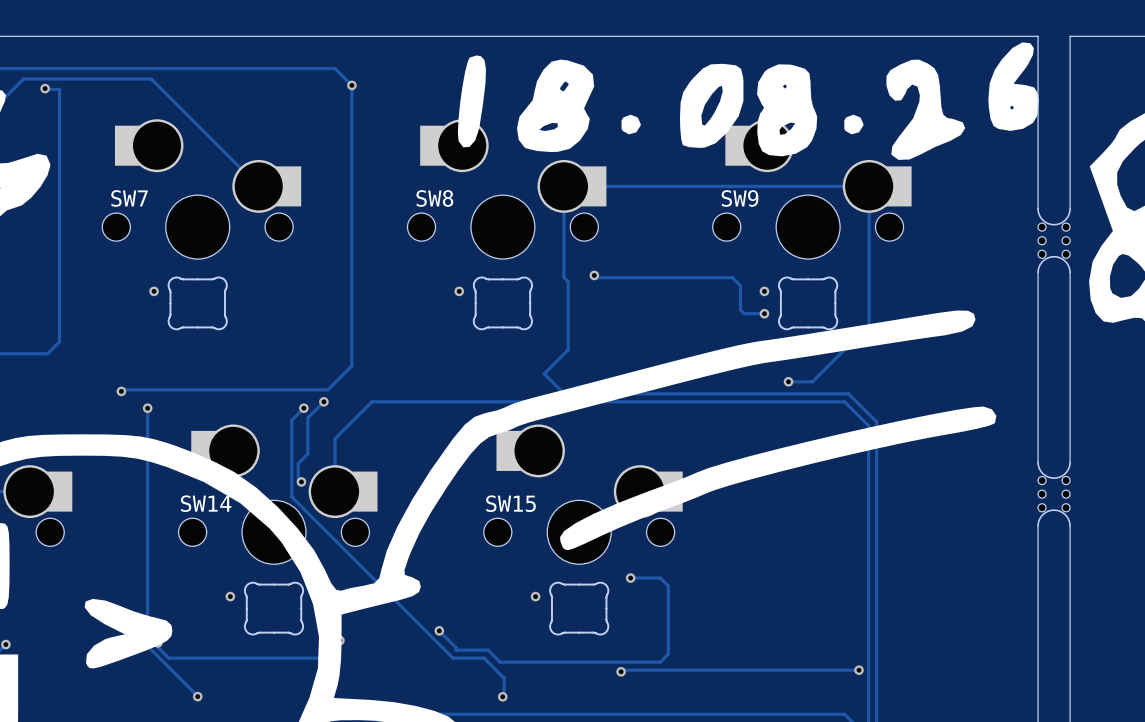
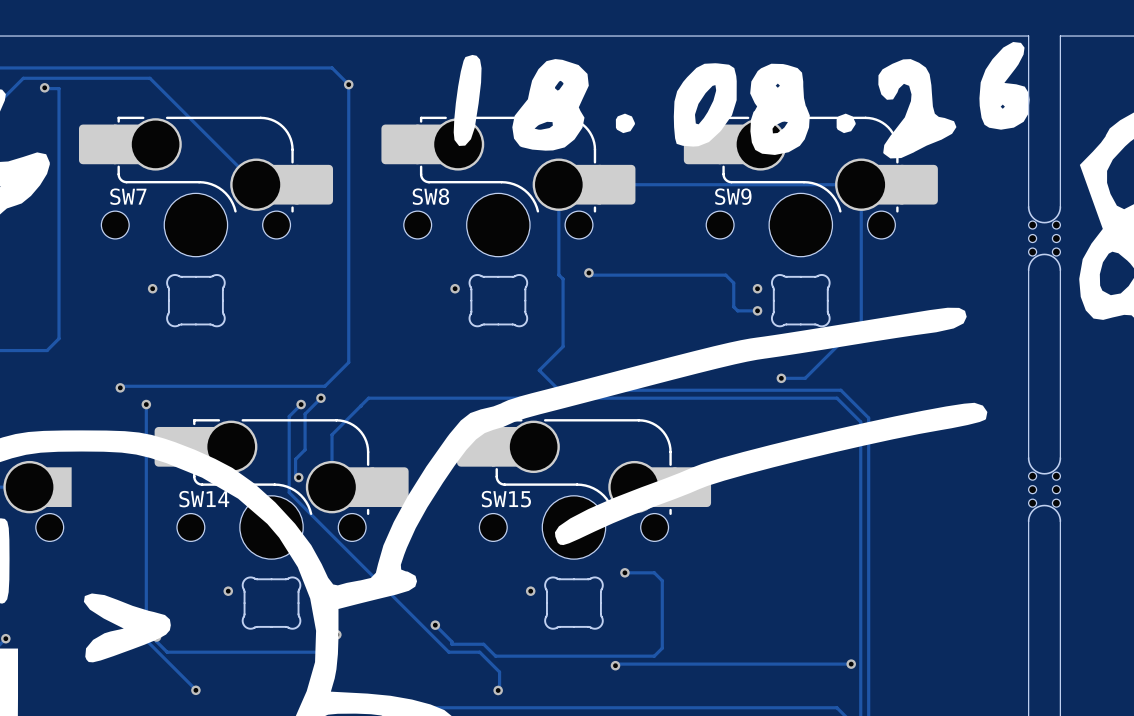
SW7 footprint: [102, 119, 302, 260] -> [78, 116, 334, 257]
SW8 footprint: [407, 119, 607, 260] -> [381, 116, 636, 257]
SW9 footprint: [712, 119, 912, 260] -> [683, 116, 938, 257]
SW14 footprint: [178, 424, 378, 565] -> [154, 419, 409, 560]
SW15 footprint: [483, 424, 683, 565] -> [457, 419, 712, 560]

